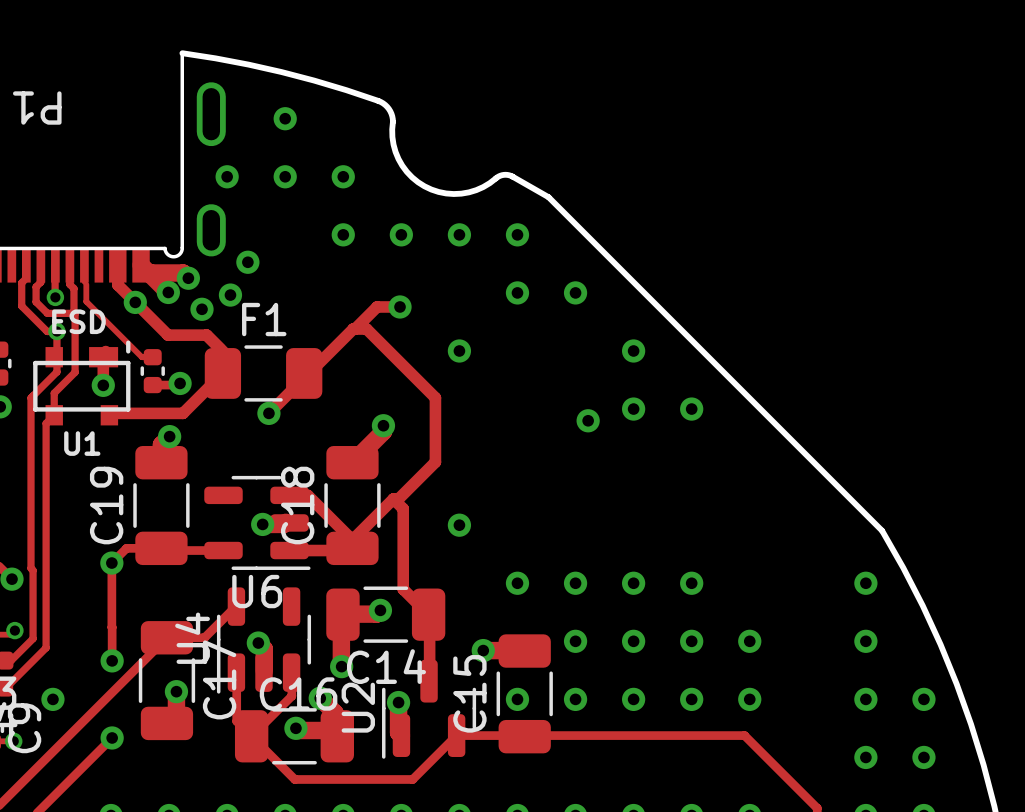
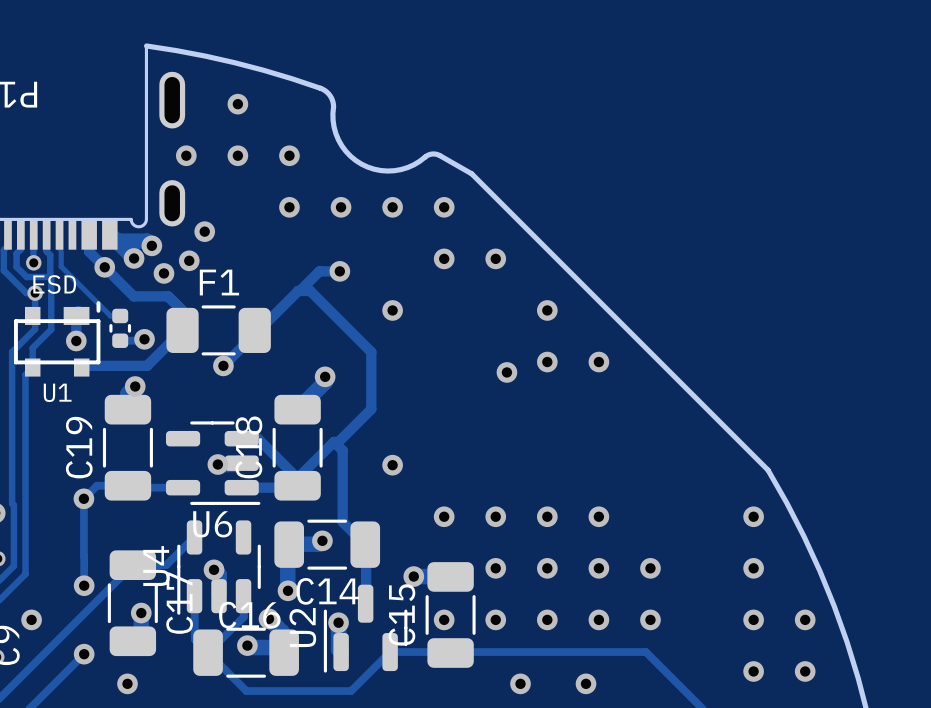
via: none -> (127, 683)
via: none -> (520, 683)
via: none -> (586, 683)

